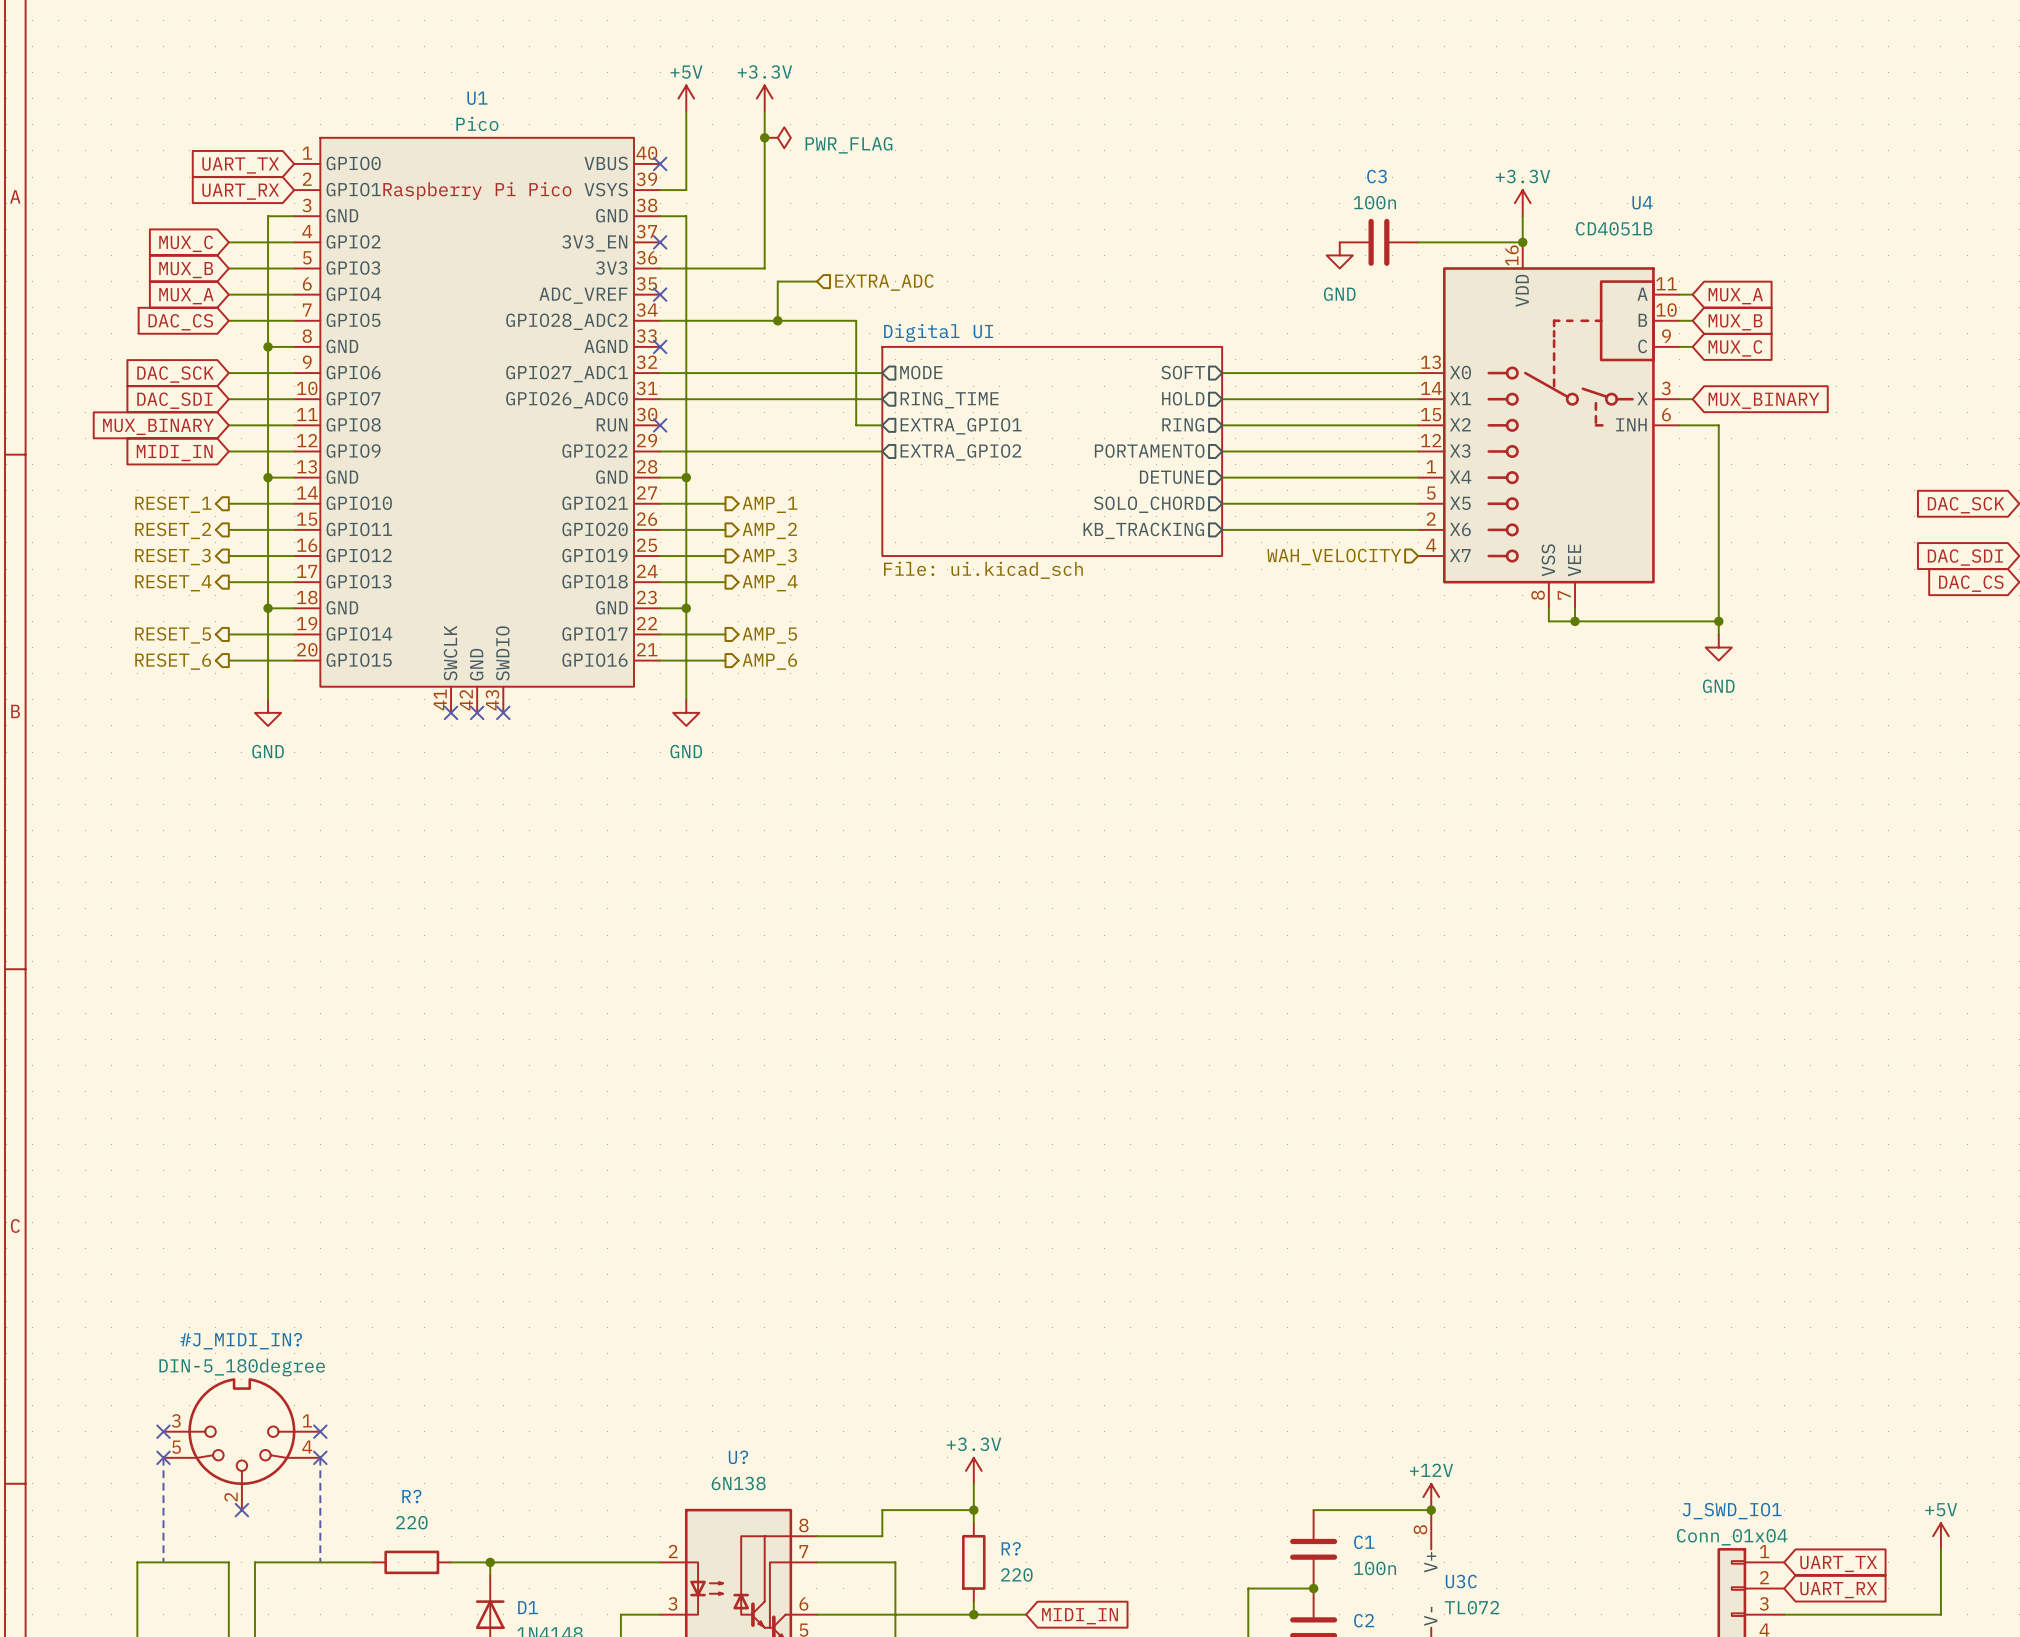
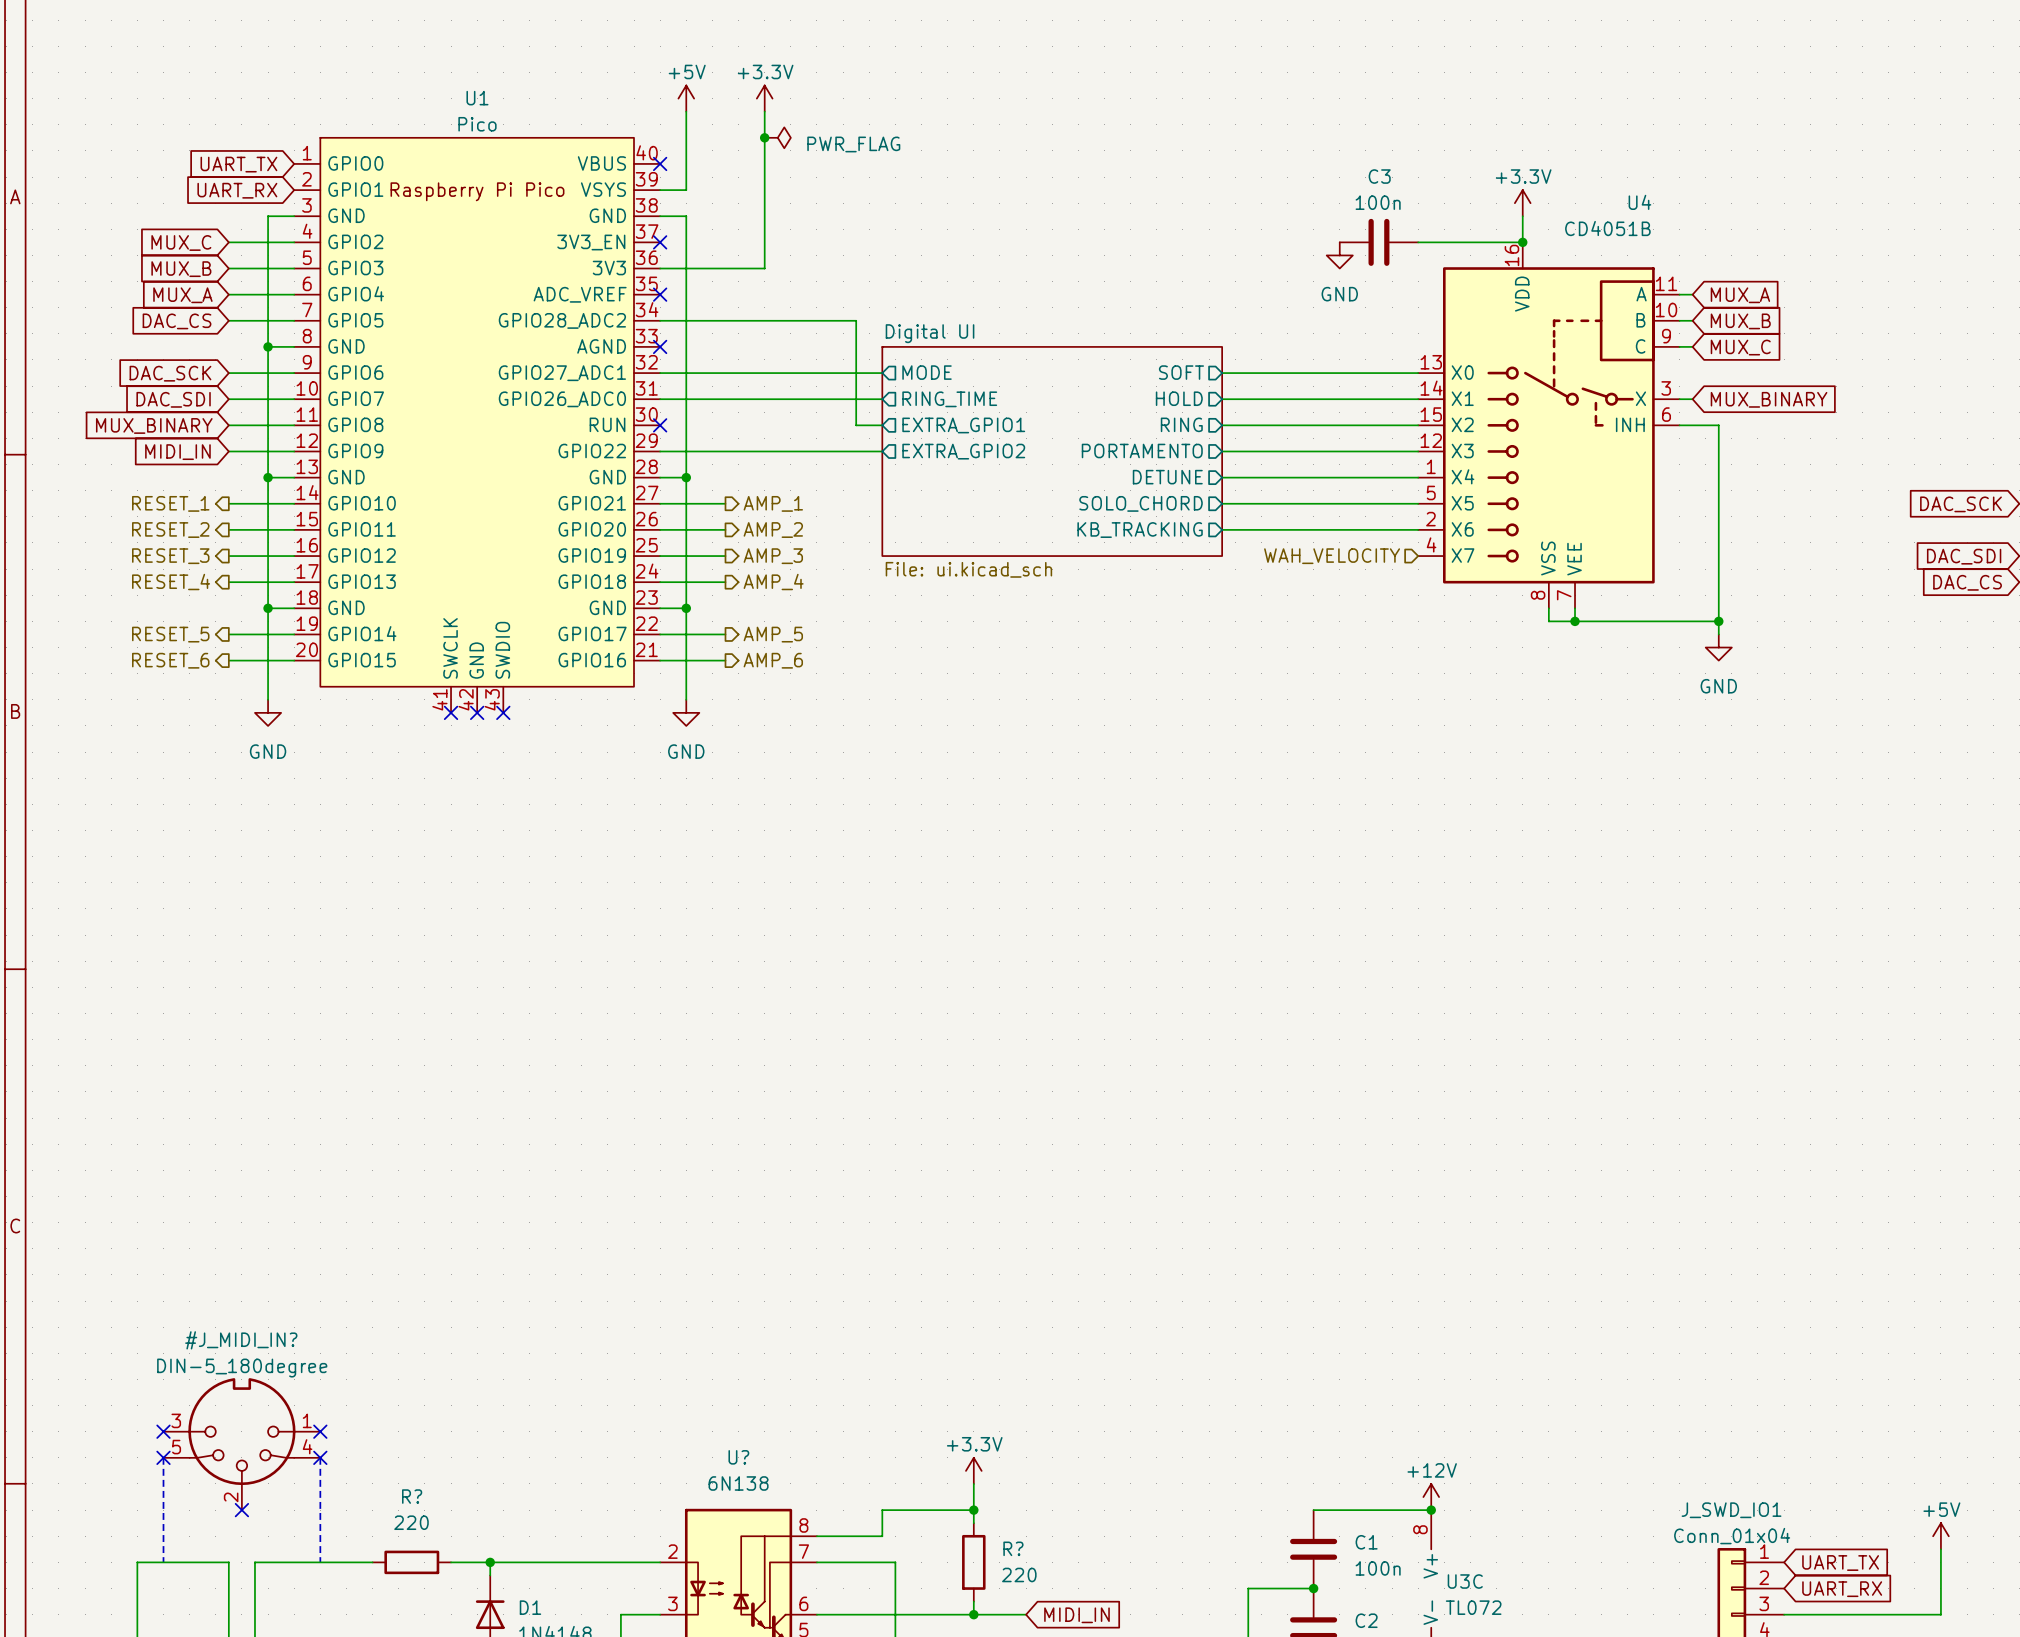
wire: (816, 281) (777, 281) (777, 320) -> none
hierarchical label: EXTRA_ADC (884, 282) -> none
junction: (777, 320) -> none

